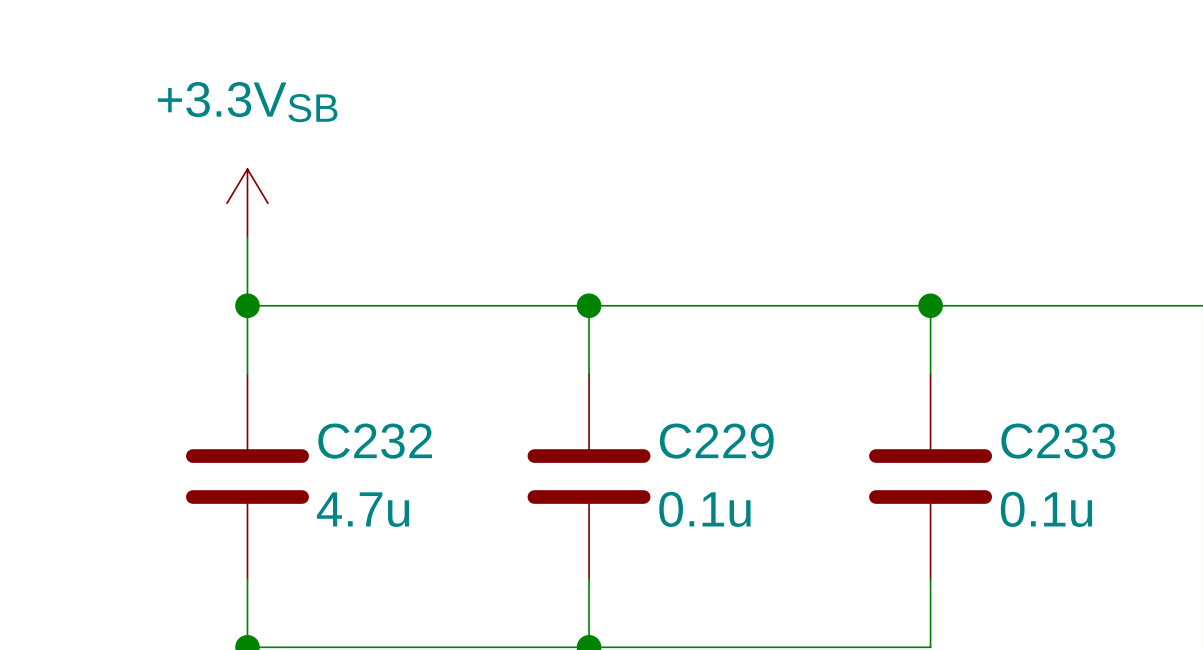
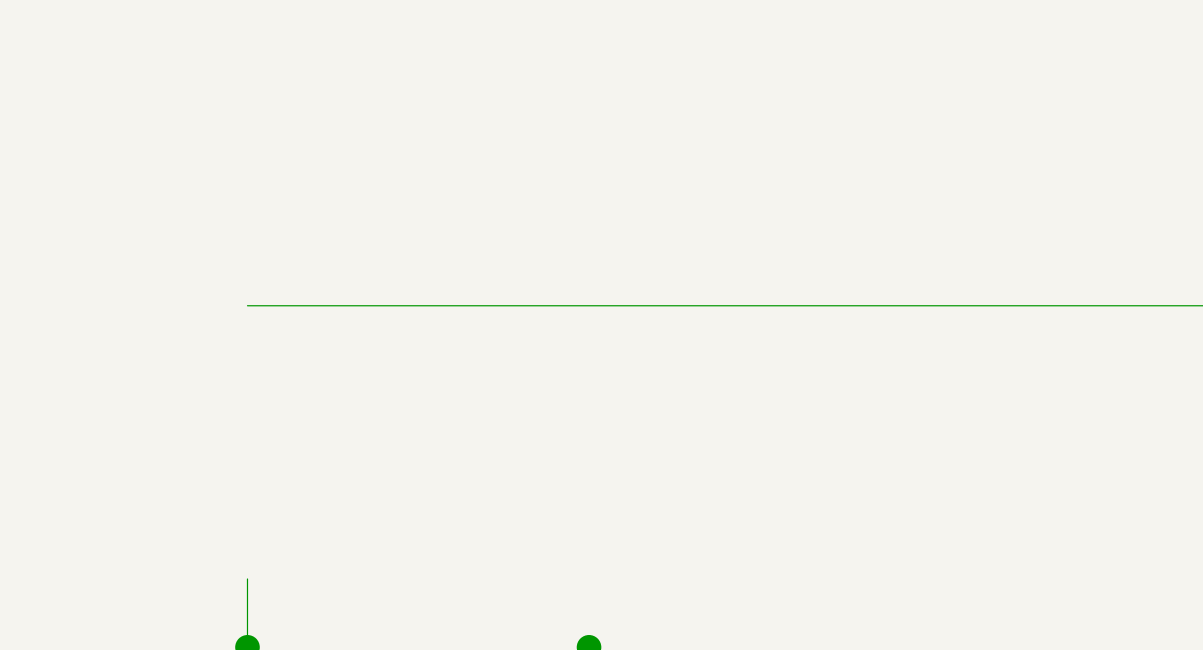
power symbol: +3.3VSB (247, 203) -> none
wire: (247, 237) (247, 374) -> none
junction: (247, 305) -> none
wire: (589, 305) (589, 374) -> none
junction: (589, 305) -> none
wire: (930, 305) (930, 374) -> none
junction: (930, 305) -> none
C232: 4.7u (247, 476) -> none
C229: 0.1u (589, 476) -> none
C233: 0.1u (930, 476) -> none
wire: (589, 578) (589, 647) -> none
wire: (930, 578) (930, 647) (247, 647) -> none

